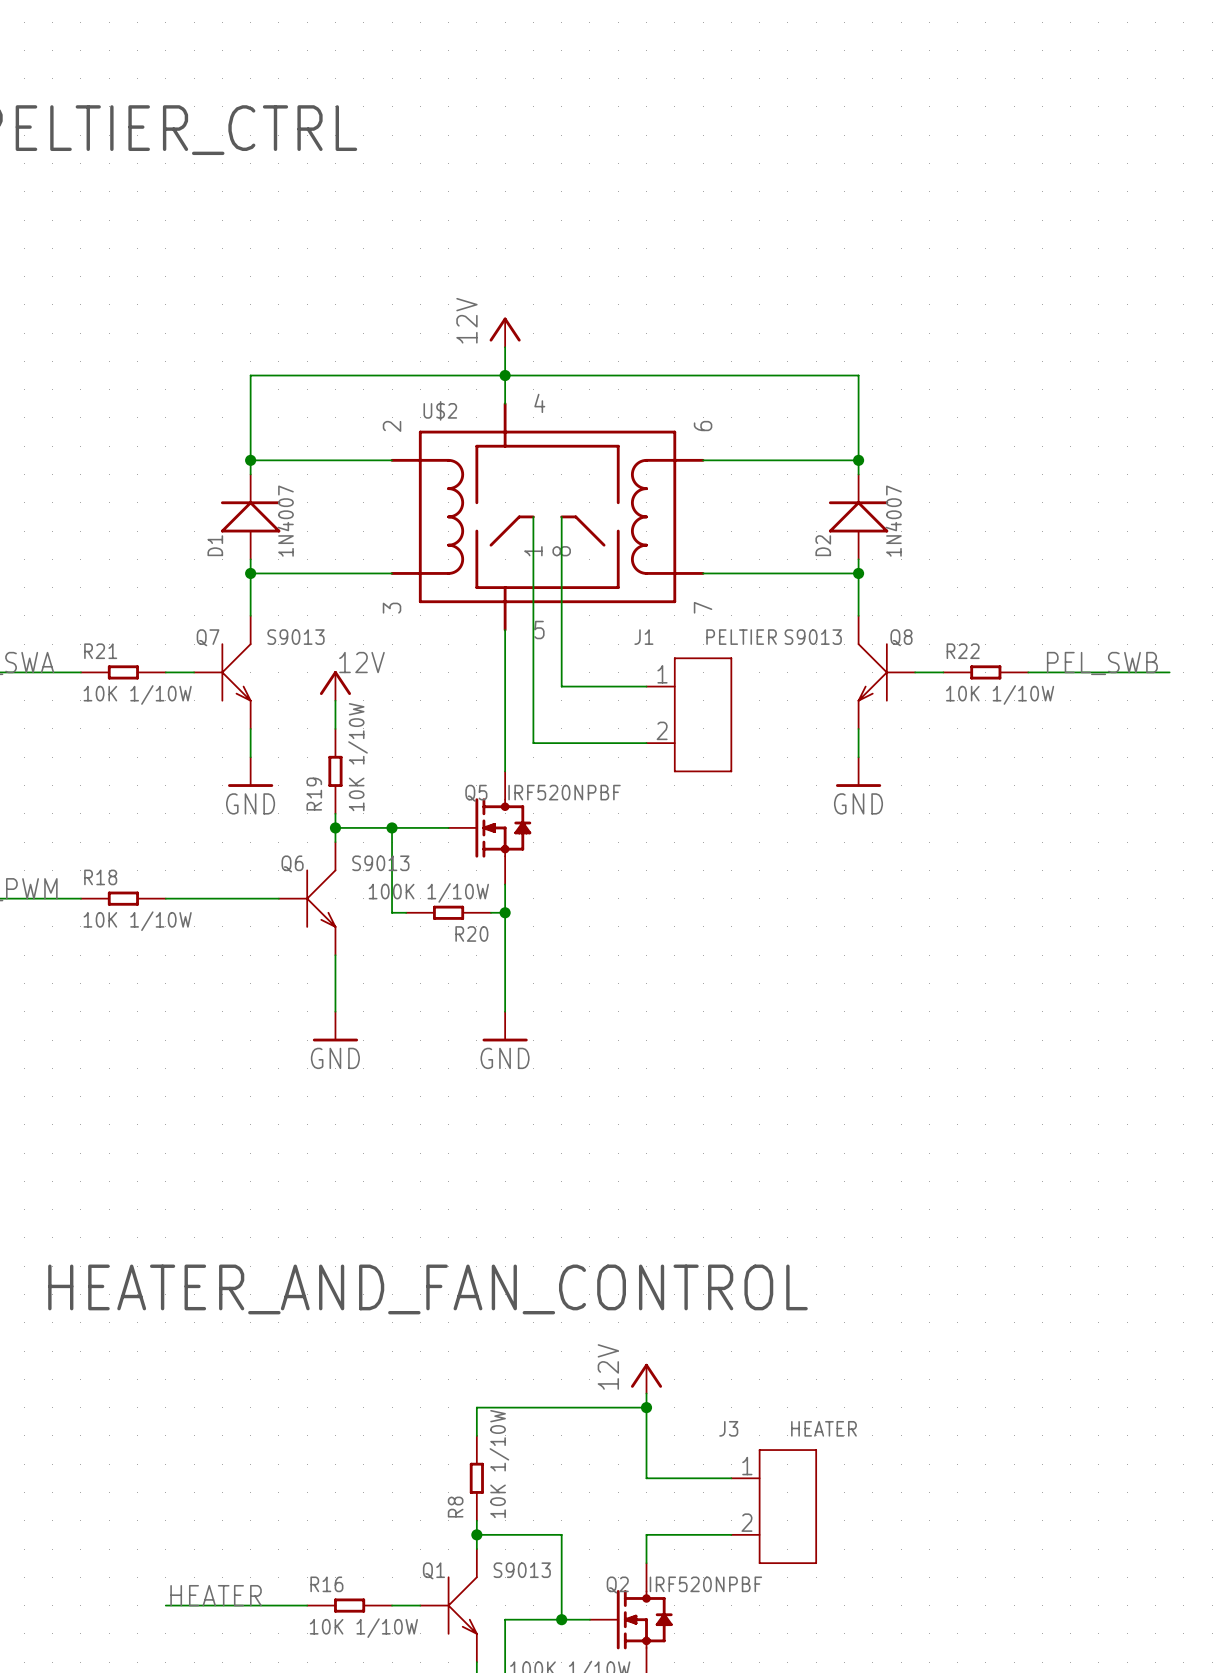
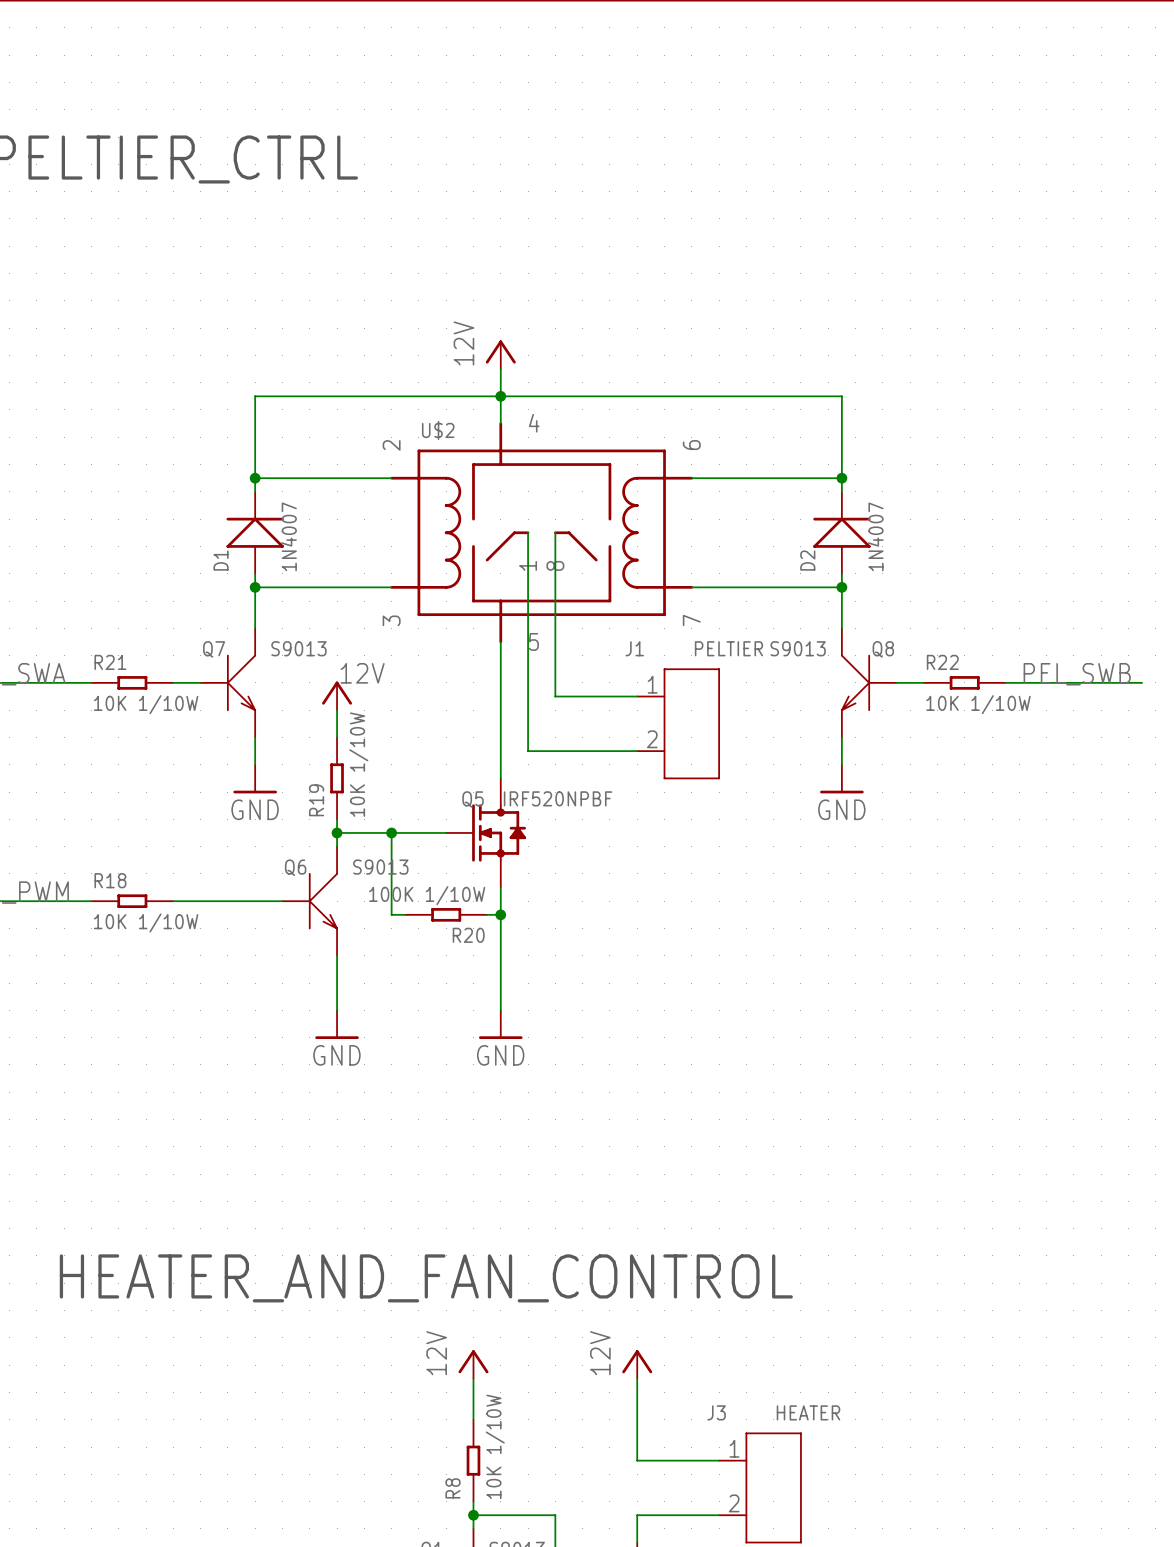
power symbol: none -> 12V (473, 1364)
wire: (476, 1407) (646, 1407) -> (473, 1392) (473, 1378)
junction: (646, 1407) -> none

